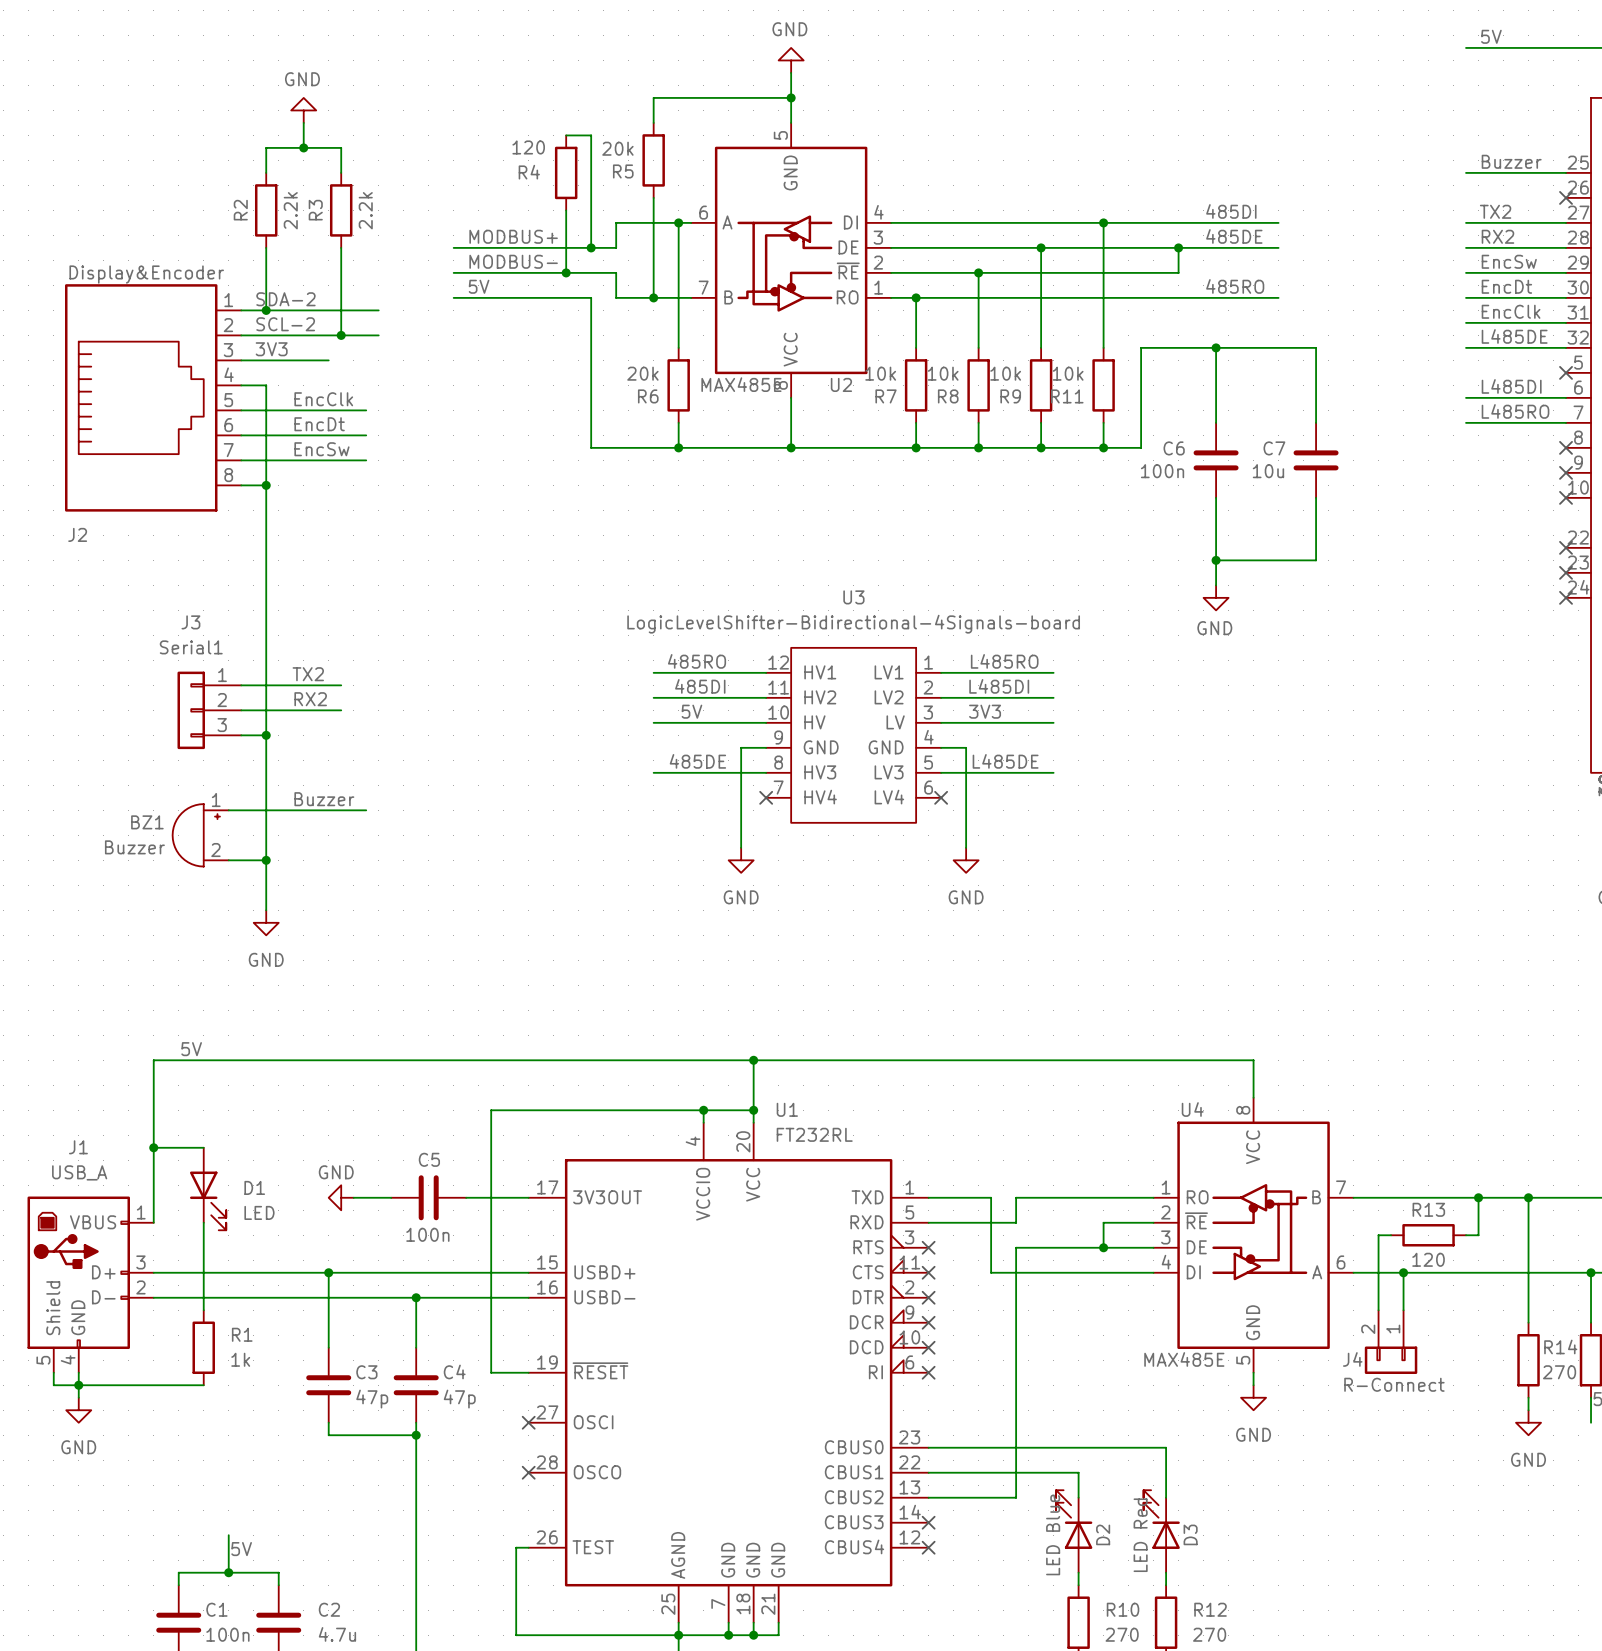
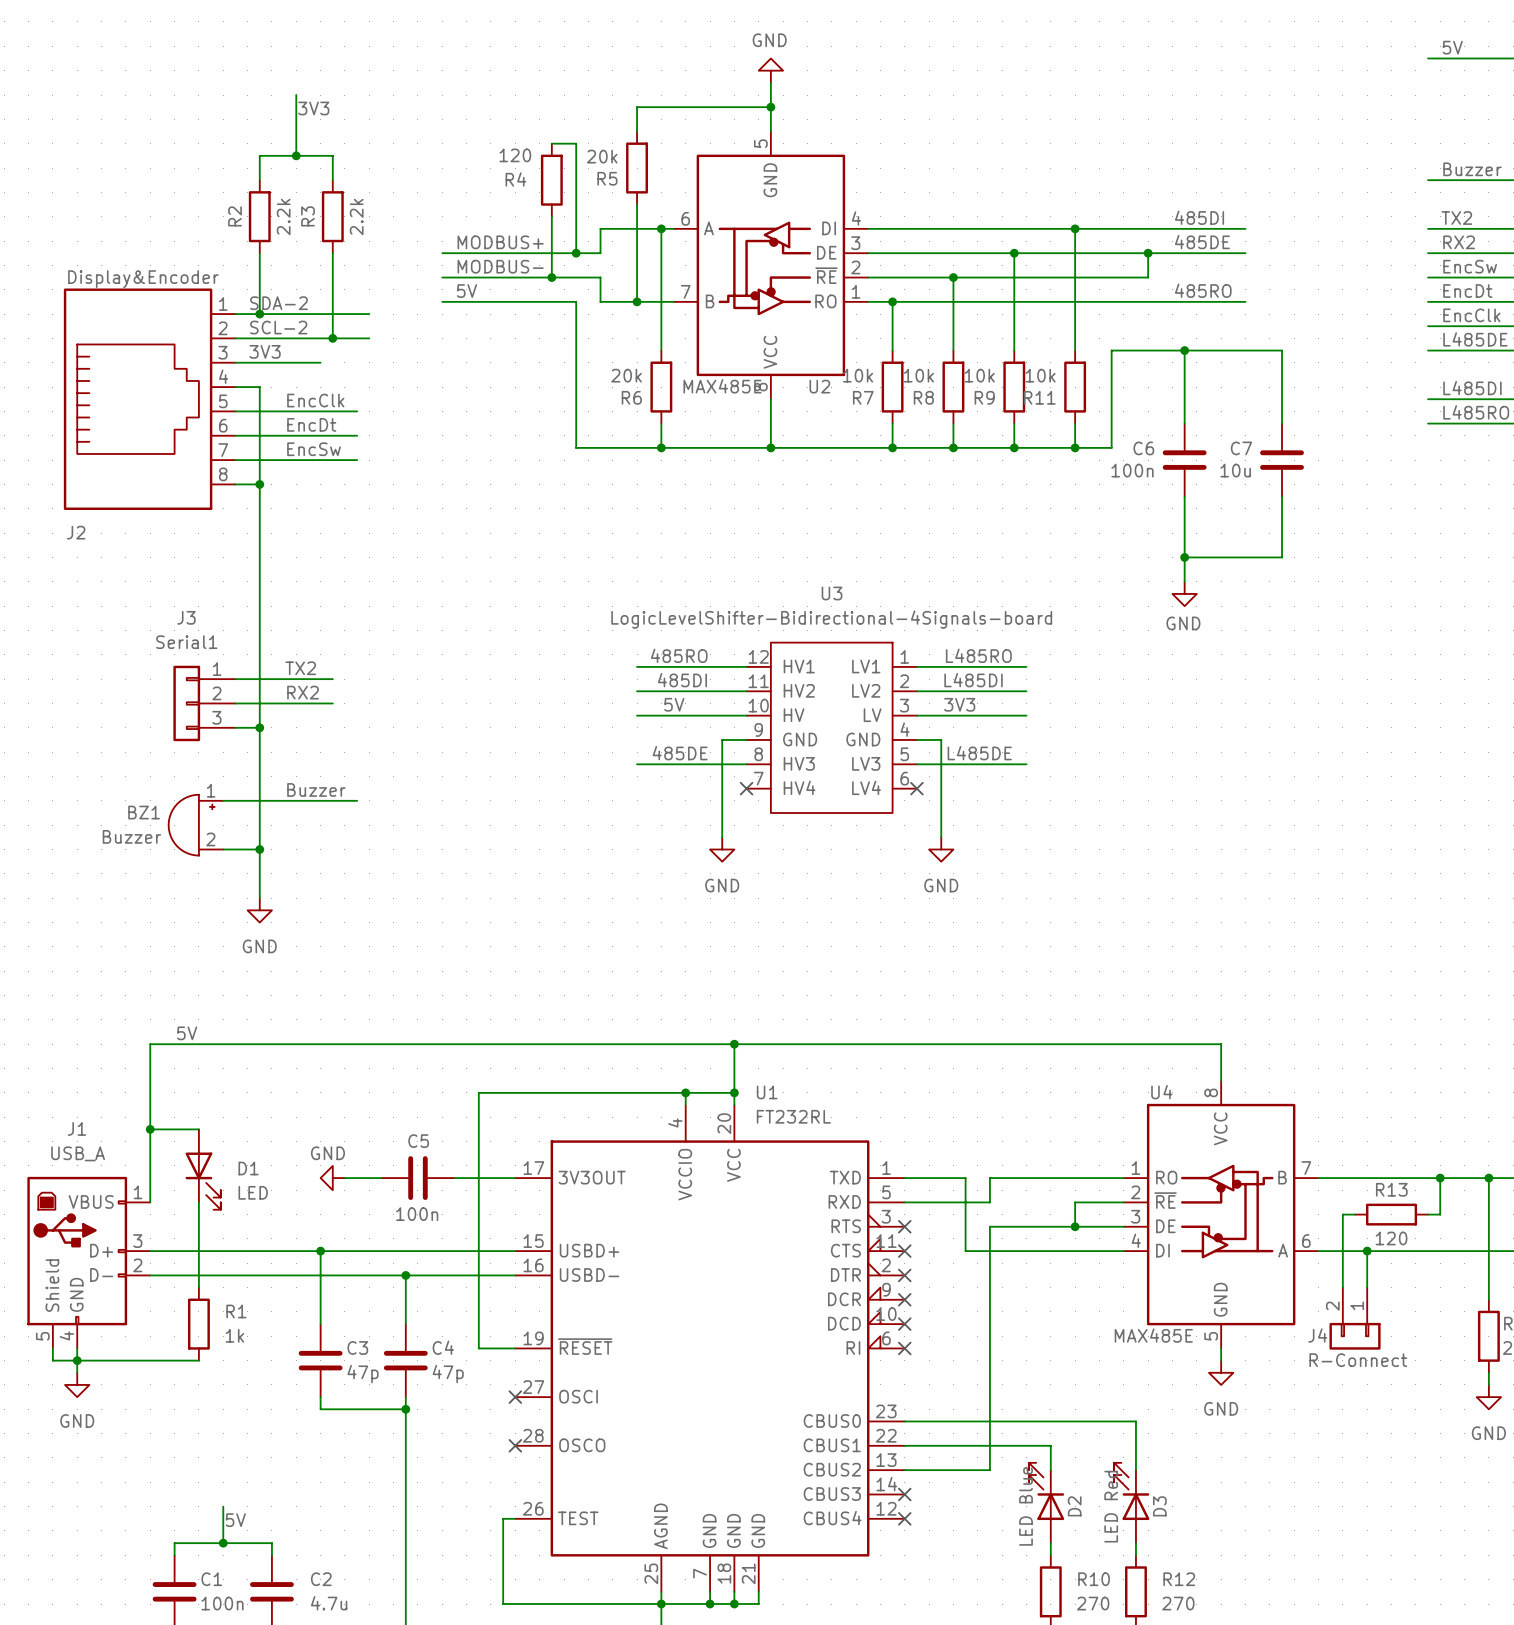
wire: none -> (296, 95) (296, 131)
label: none -> 3V3 (313, 108)
power symbol: GND (303, 110) -> none

